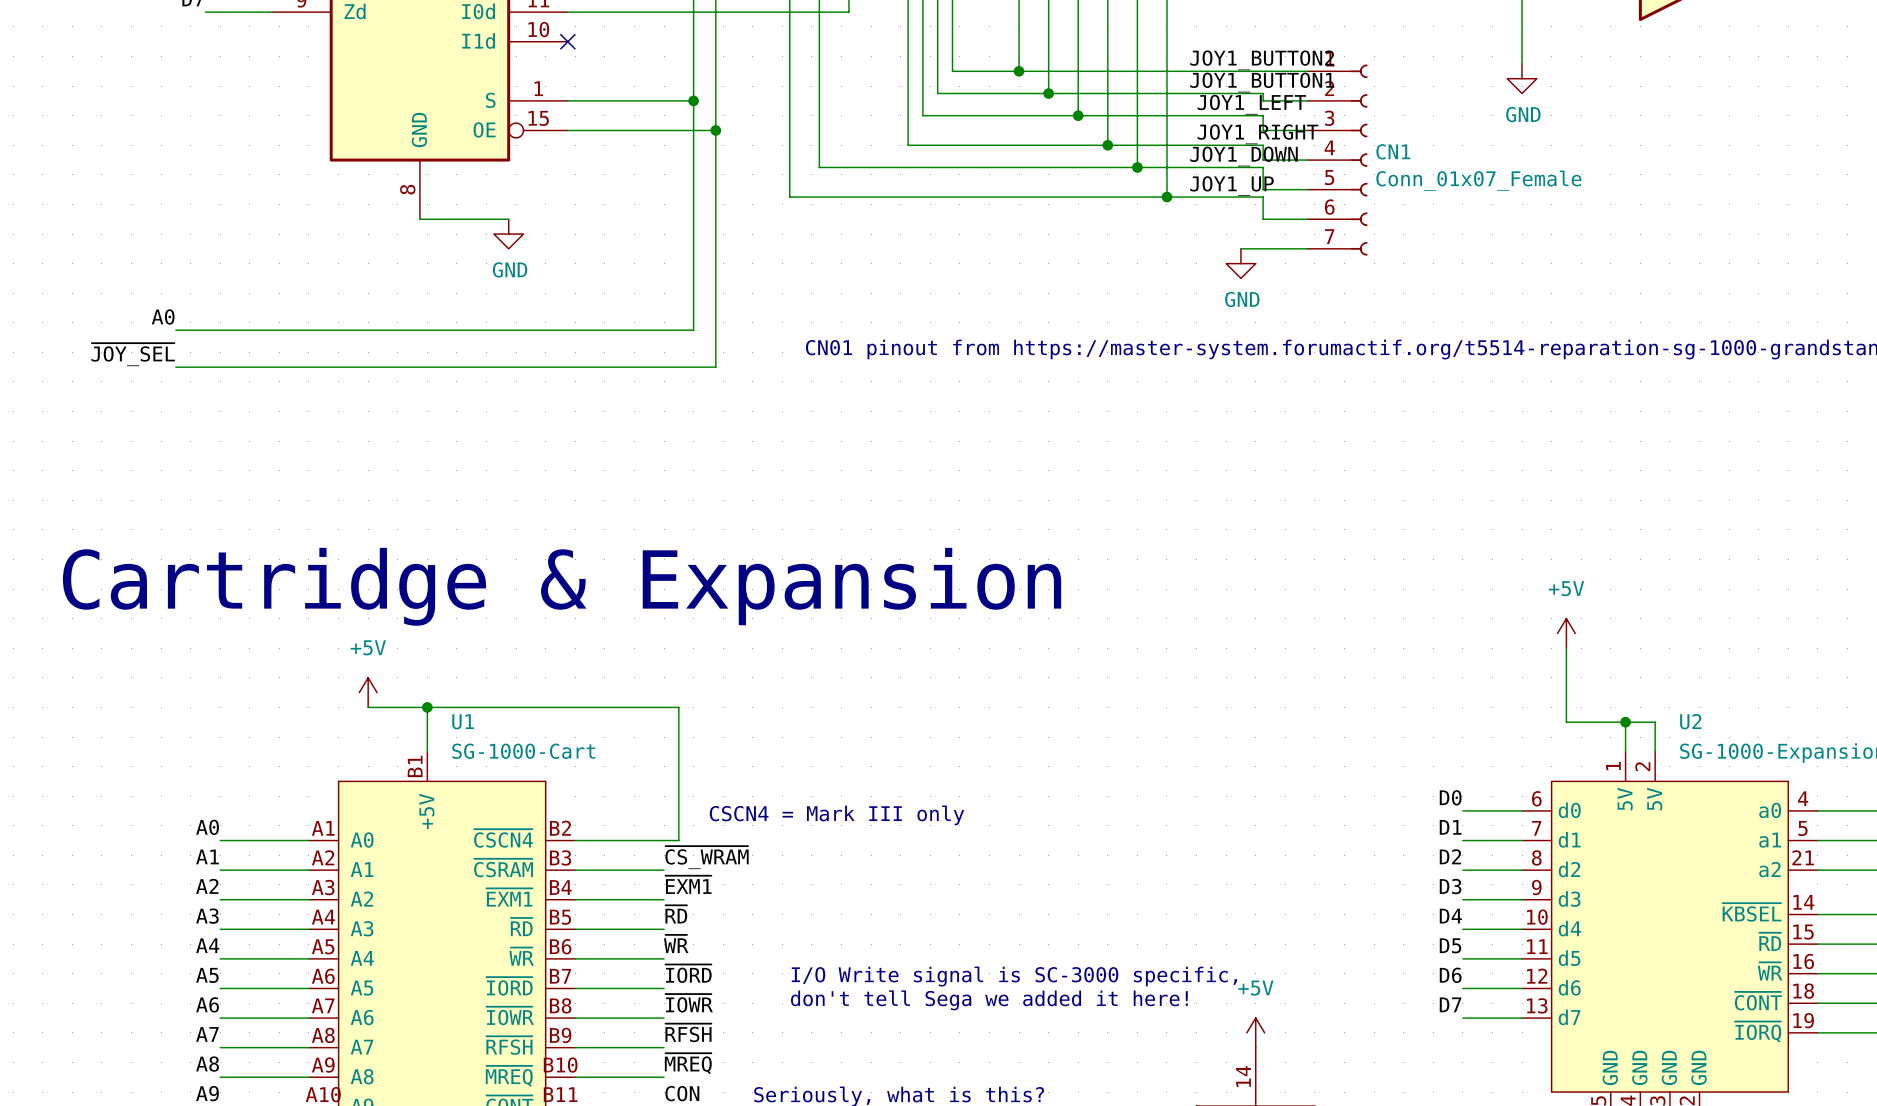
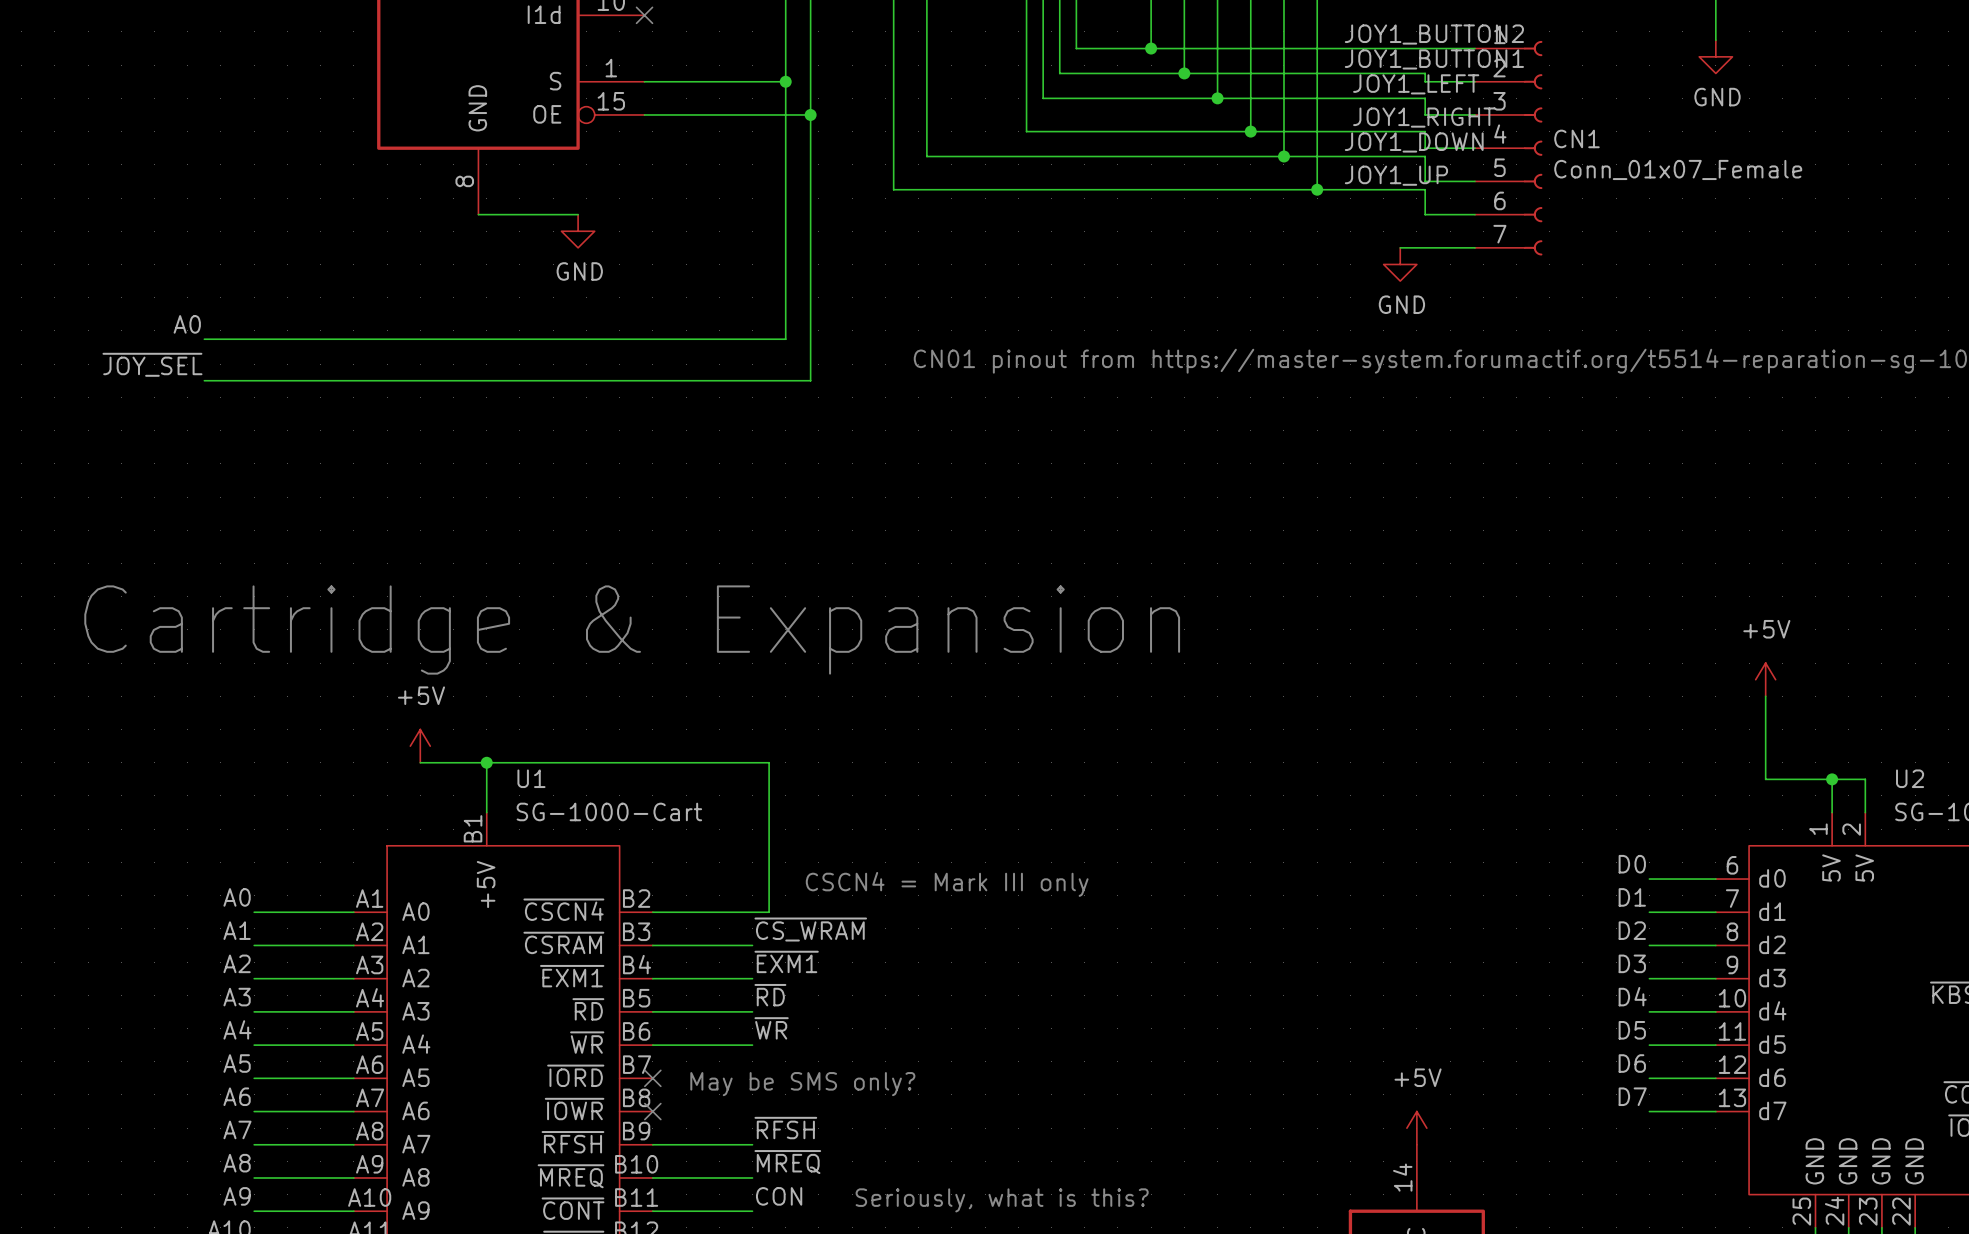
label: ~{IORD} (688, 973) -> none
text: I/O Write signal is SC-3000 specific, (1014, 976) -> none
wire: (575, 988) (664, 988) -> none
no-connect mark: none -> (652, 1078)
text: none -> May be SMS only? (802, 1084)
text: don't tell Sega we added it here! (989, 1000) -> none
label: ~{IOWR} (689, 1003) -> none
wire: (575, 1018) (664, 1018) -> none
no-connect mark: none -> (652, 1111)

